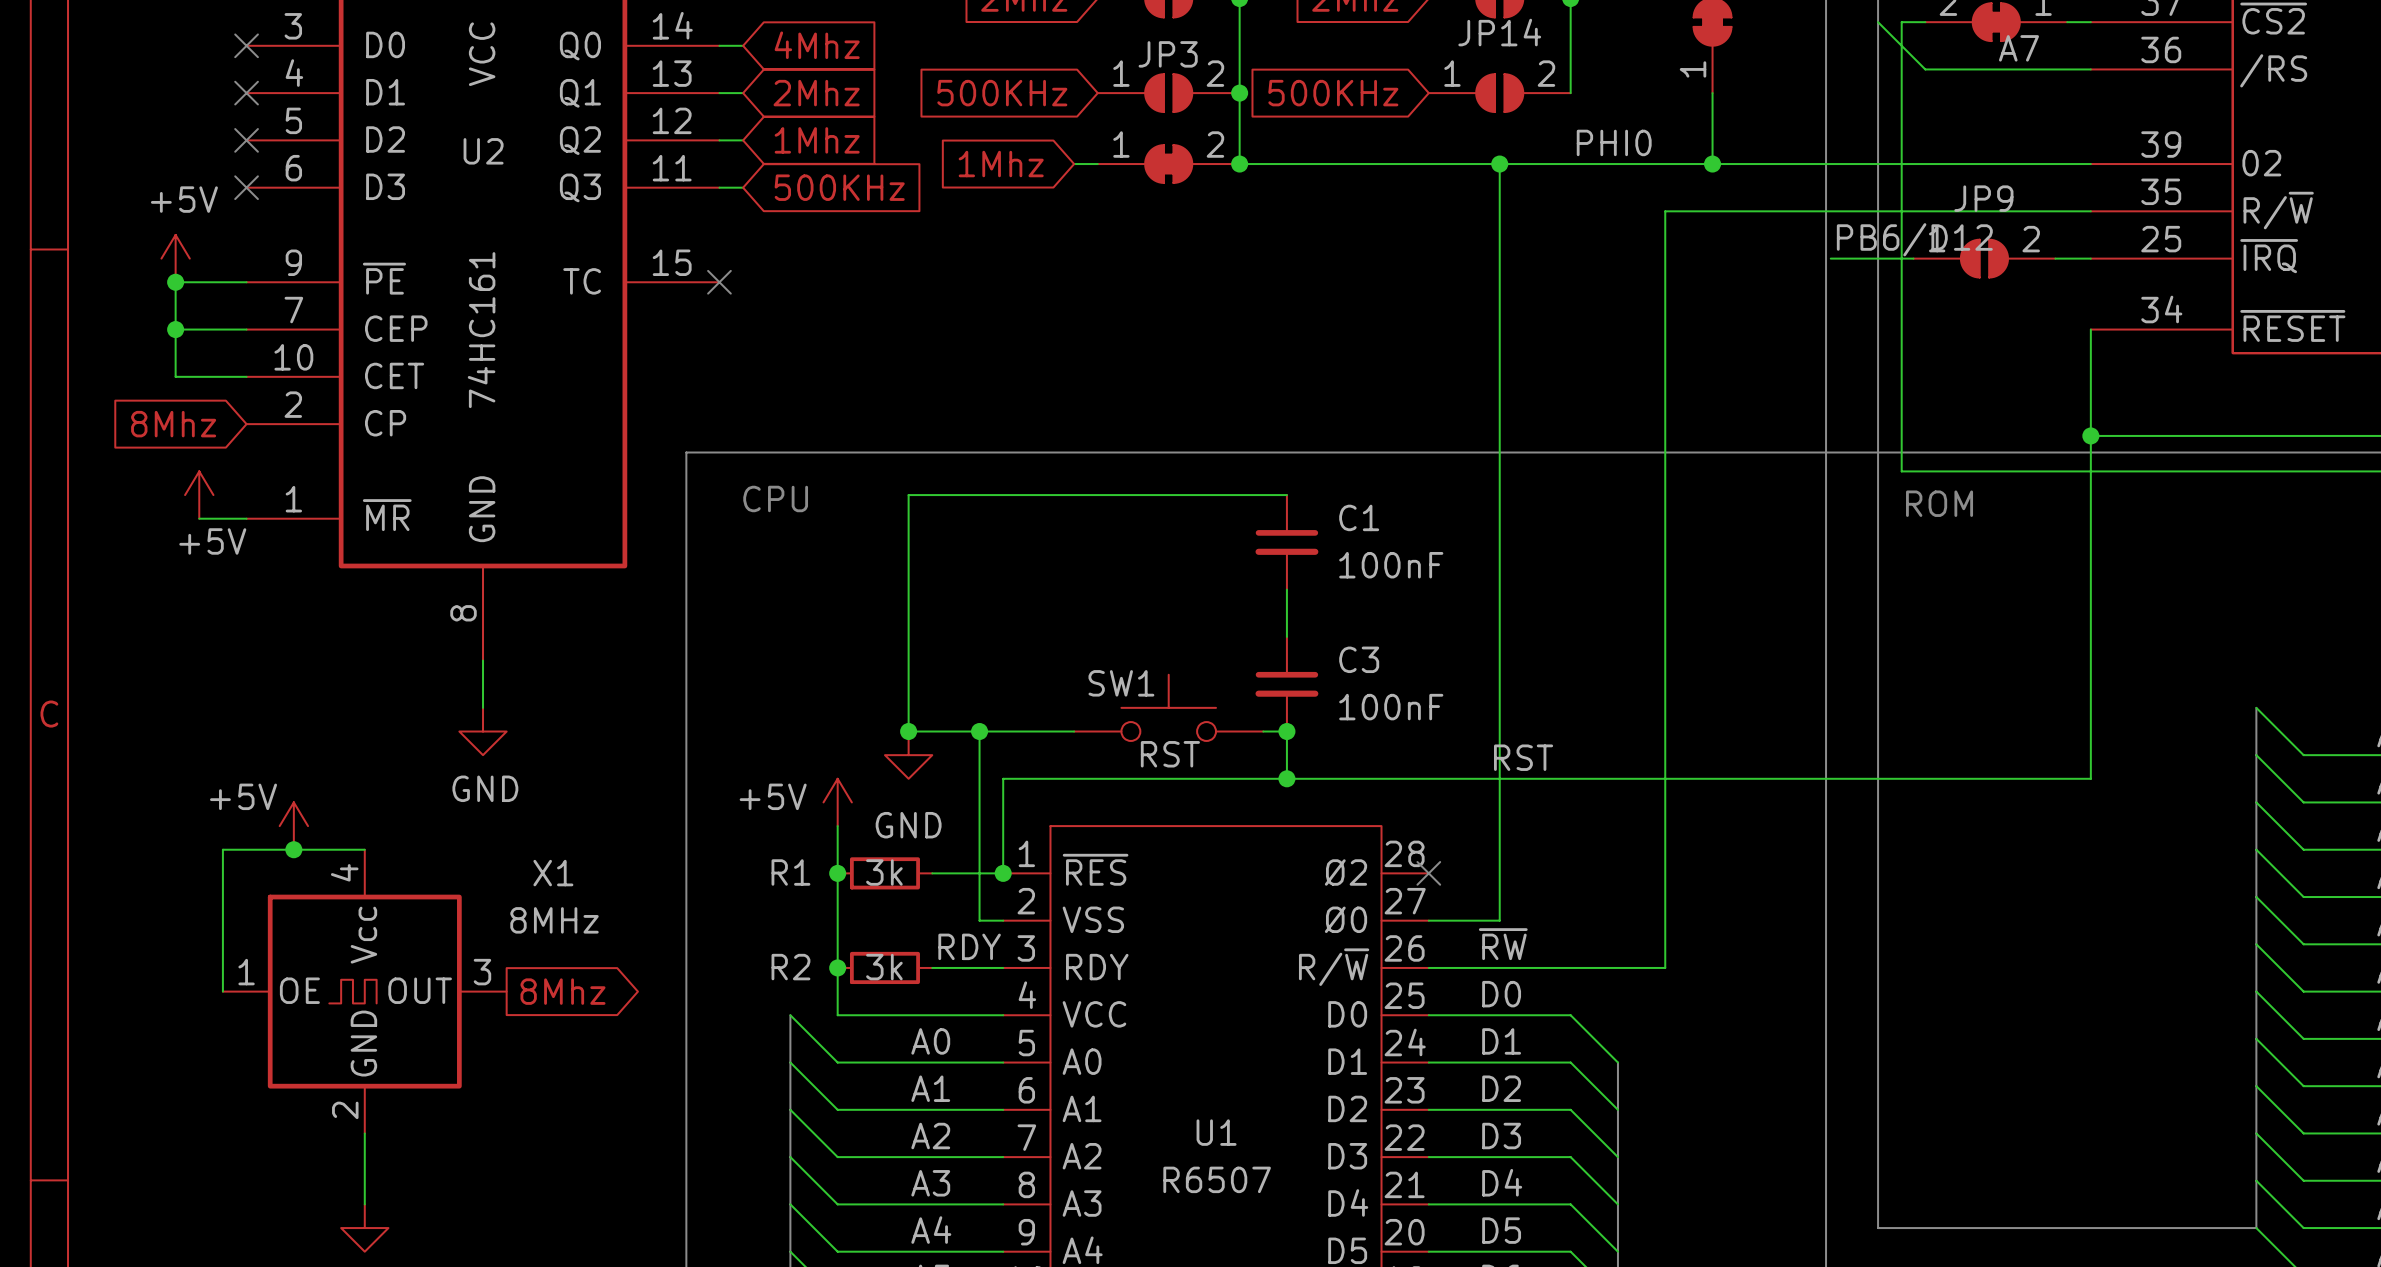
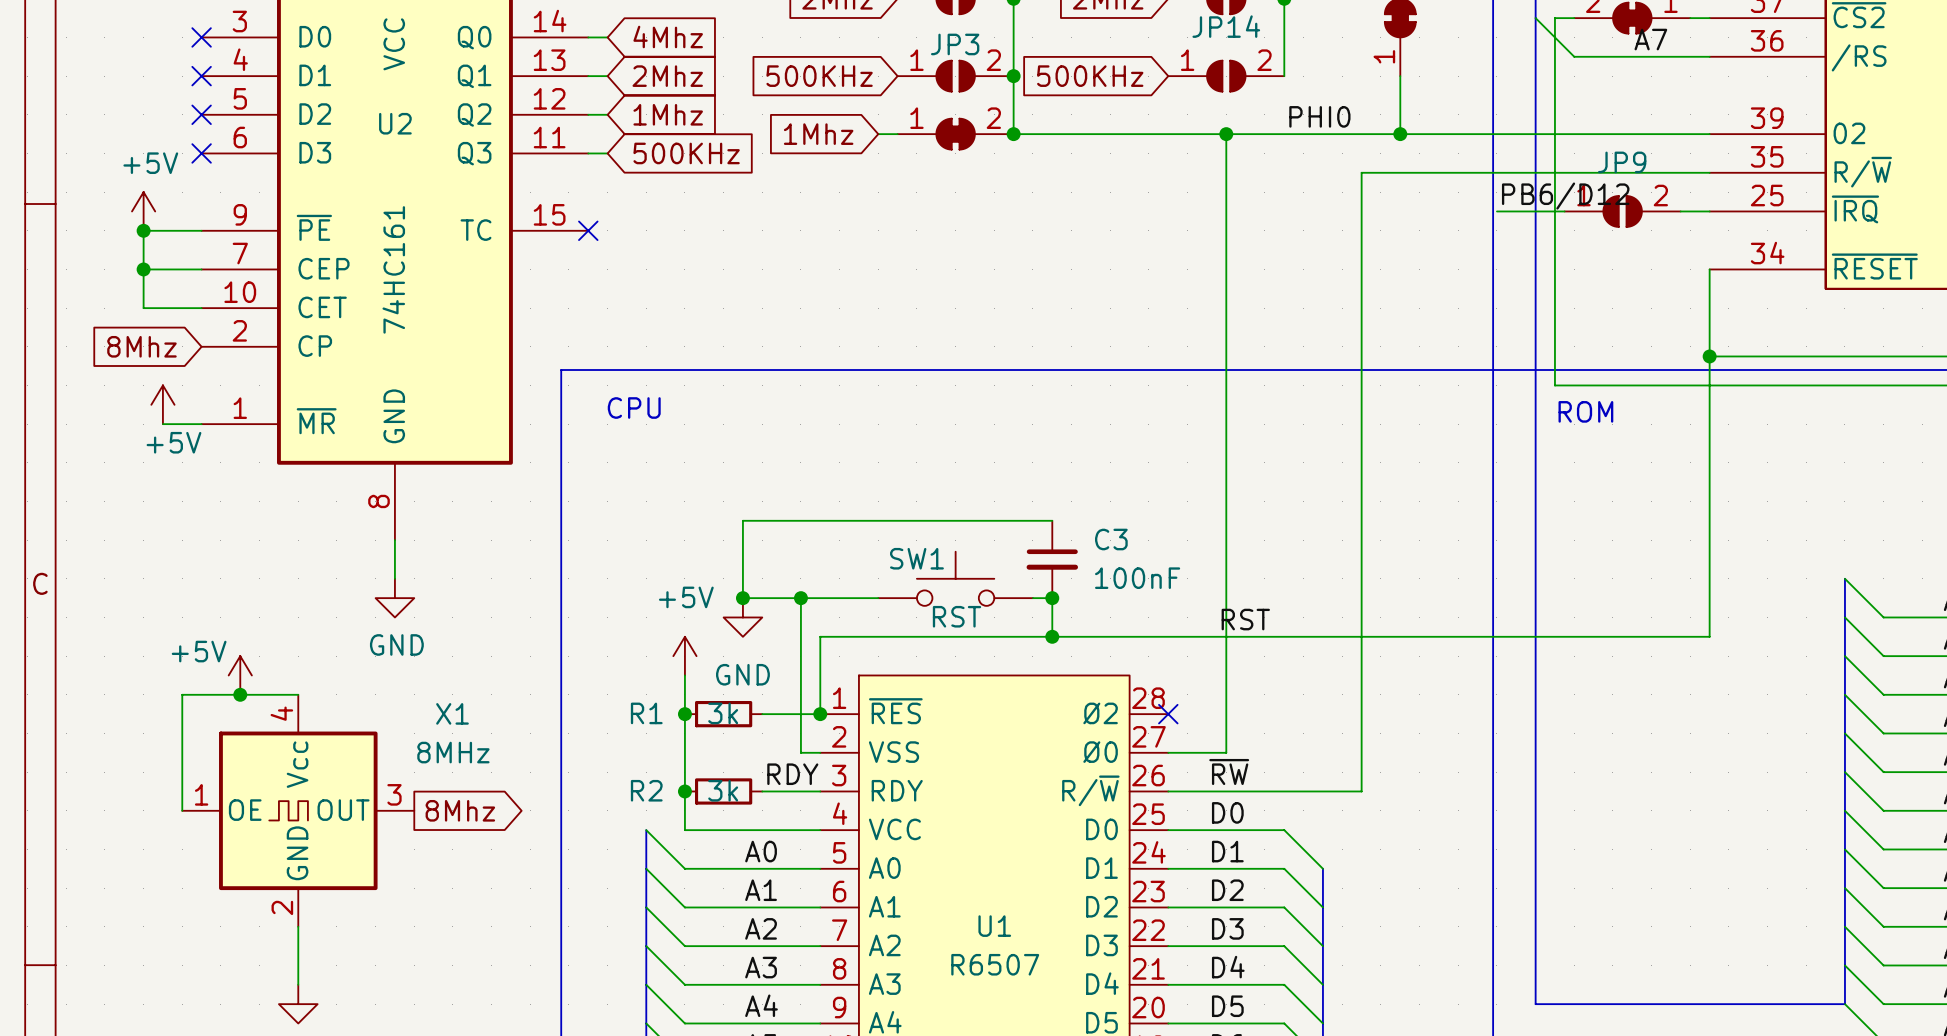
wire: (1286, 495) (908, 495) (908, 636) -> (1052, 520) (742, 520)
C1: 100nF (1286, 542) -> none
wire: (1286, 589) (1286, 636) -> none
power symbol text position: +5V (773, 796) -> +5V (686, 597)

